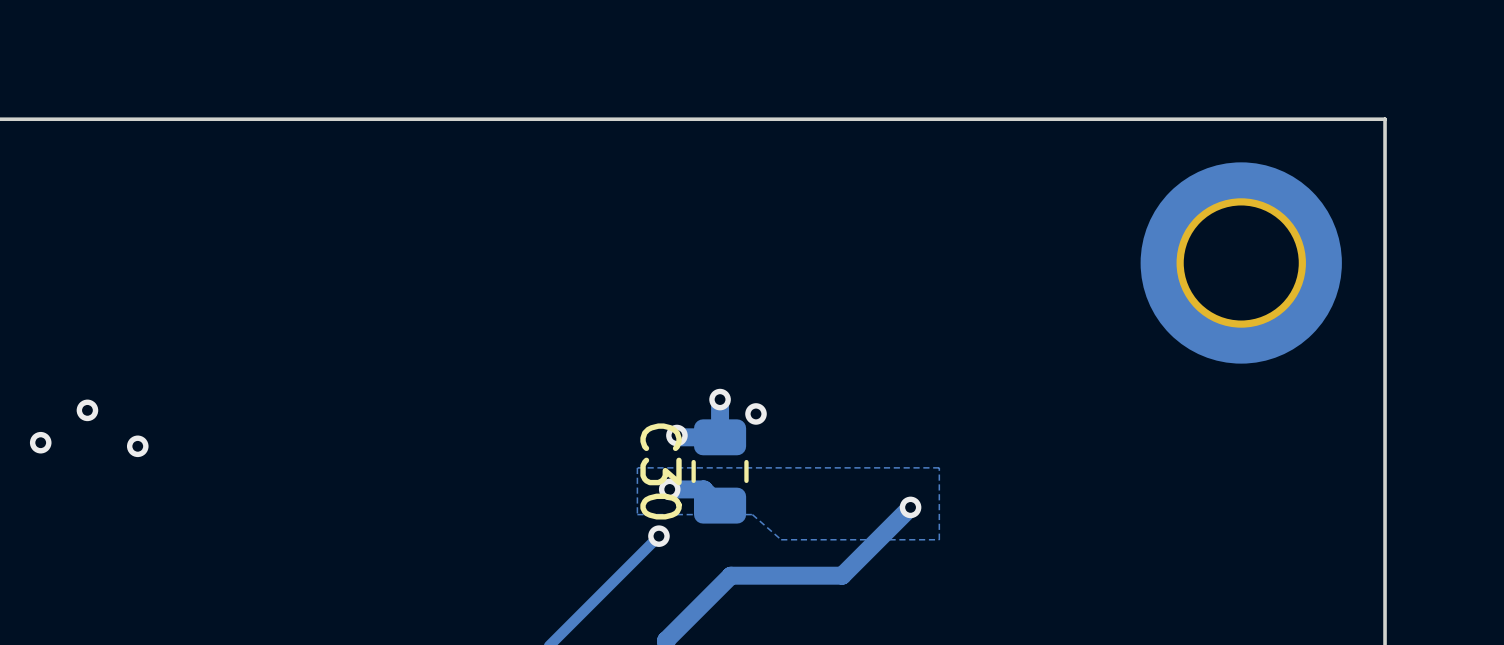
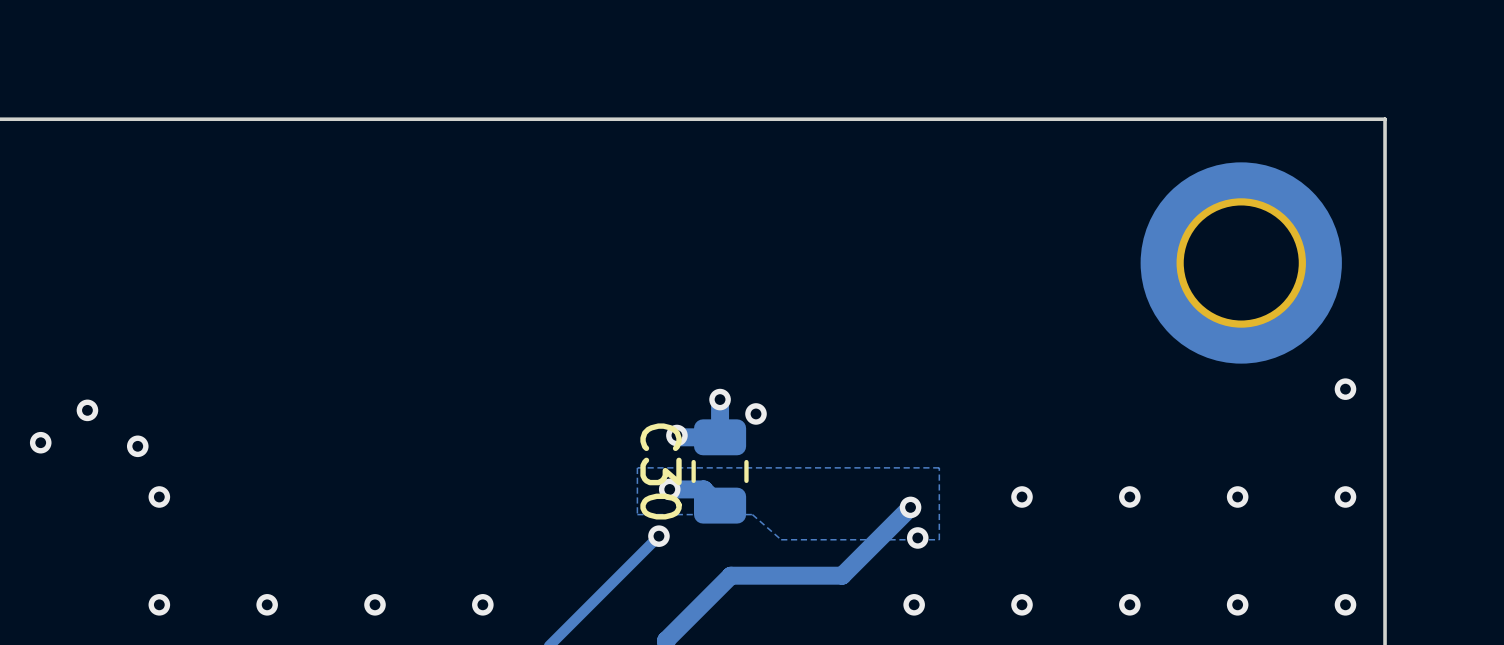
via: none -> (1345, 389)
via: none -> (159, 496)
via: none -> (1021, 496)
via: none -> (1129, 496)
via: none -> (1237, 496)
via: none -> (1345, 496)
via: none -> (917, 537)
via: none -> (159, 604)
via: none -> (267, 604)
via: none -> (375, 604)
via: none -> (482, 604)
via: none -> (914, 604)
via: none -> (1021, 604)
via: none -> (1129, 604)
via: none -> (1237, 604)
via: none -> (1345, 604)

